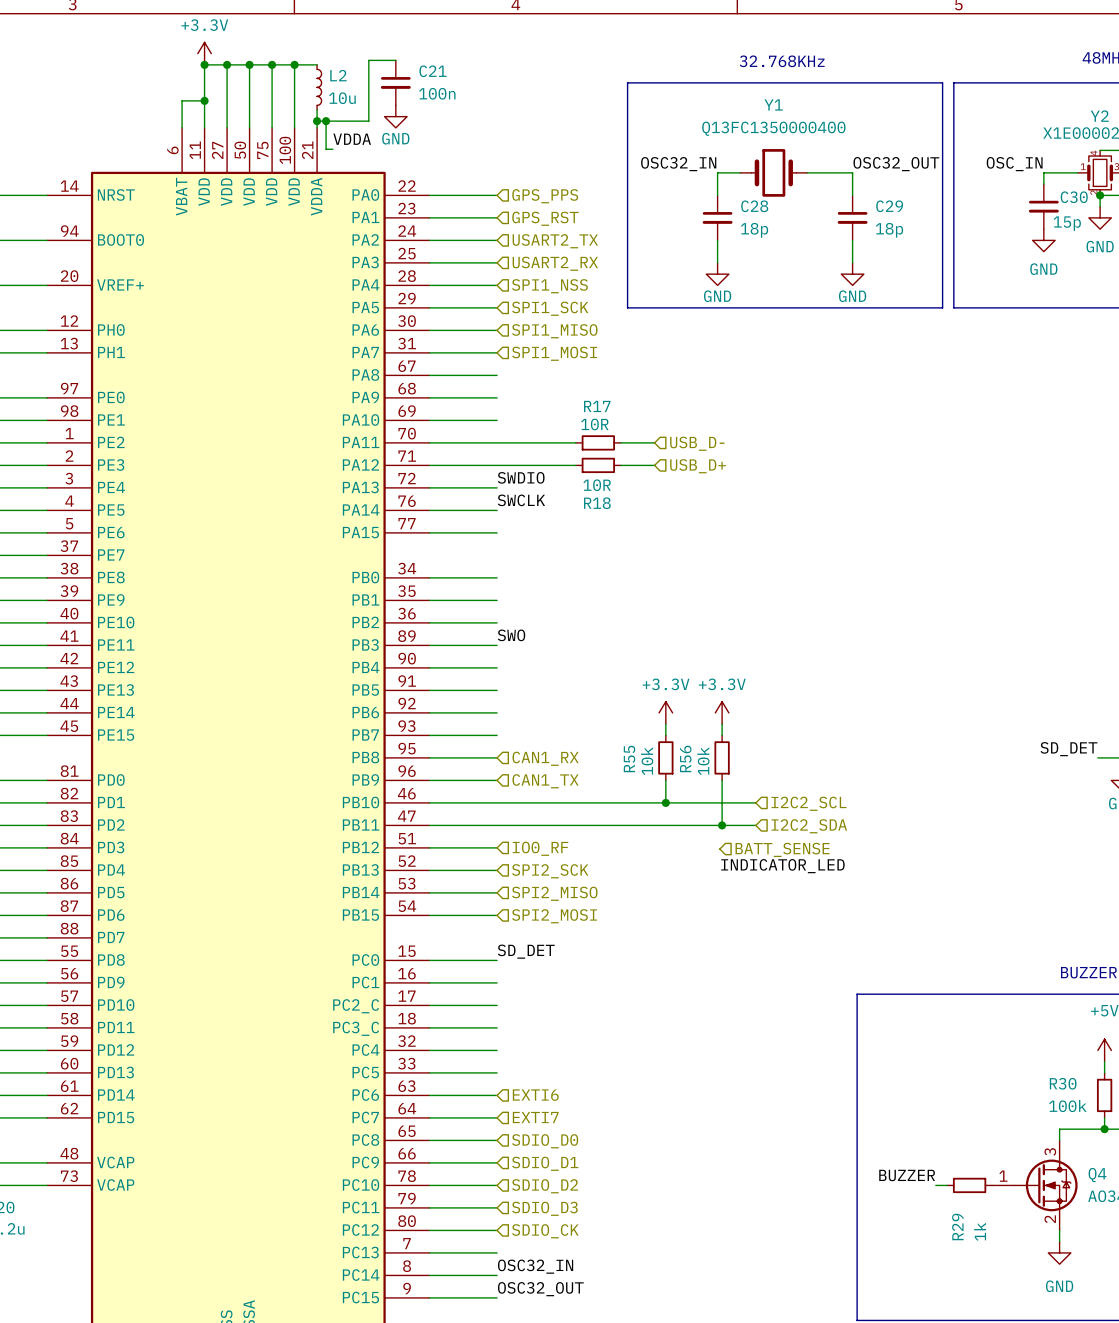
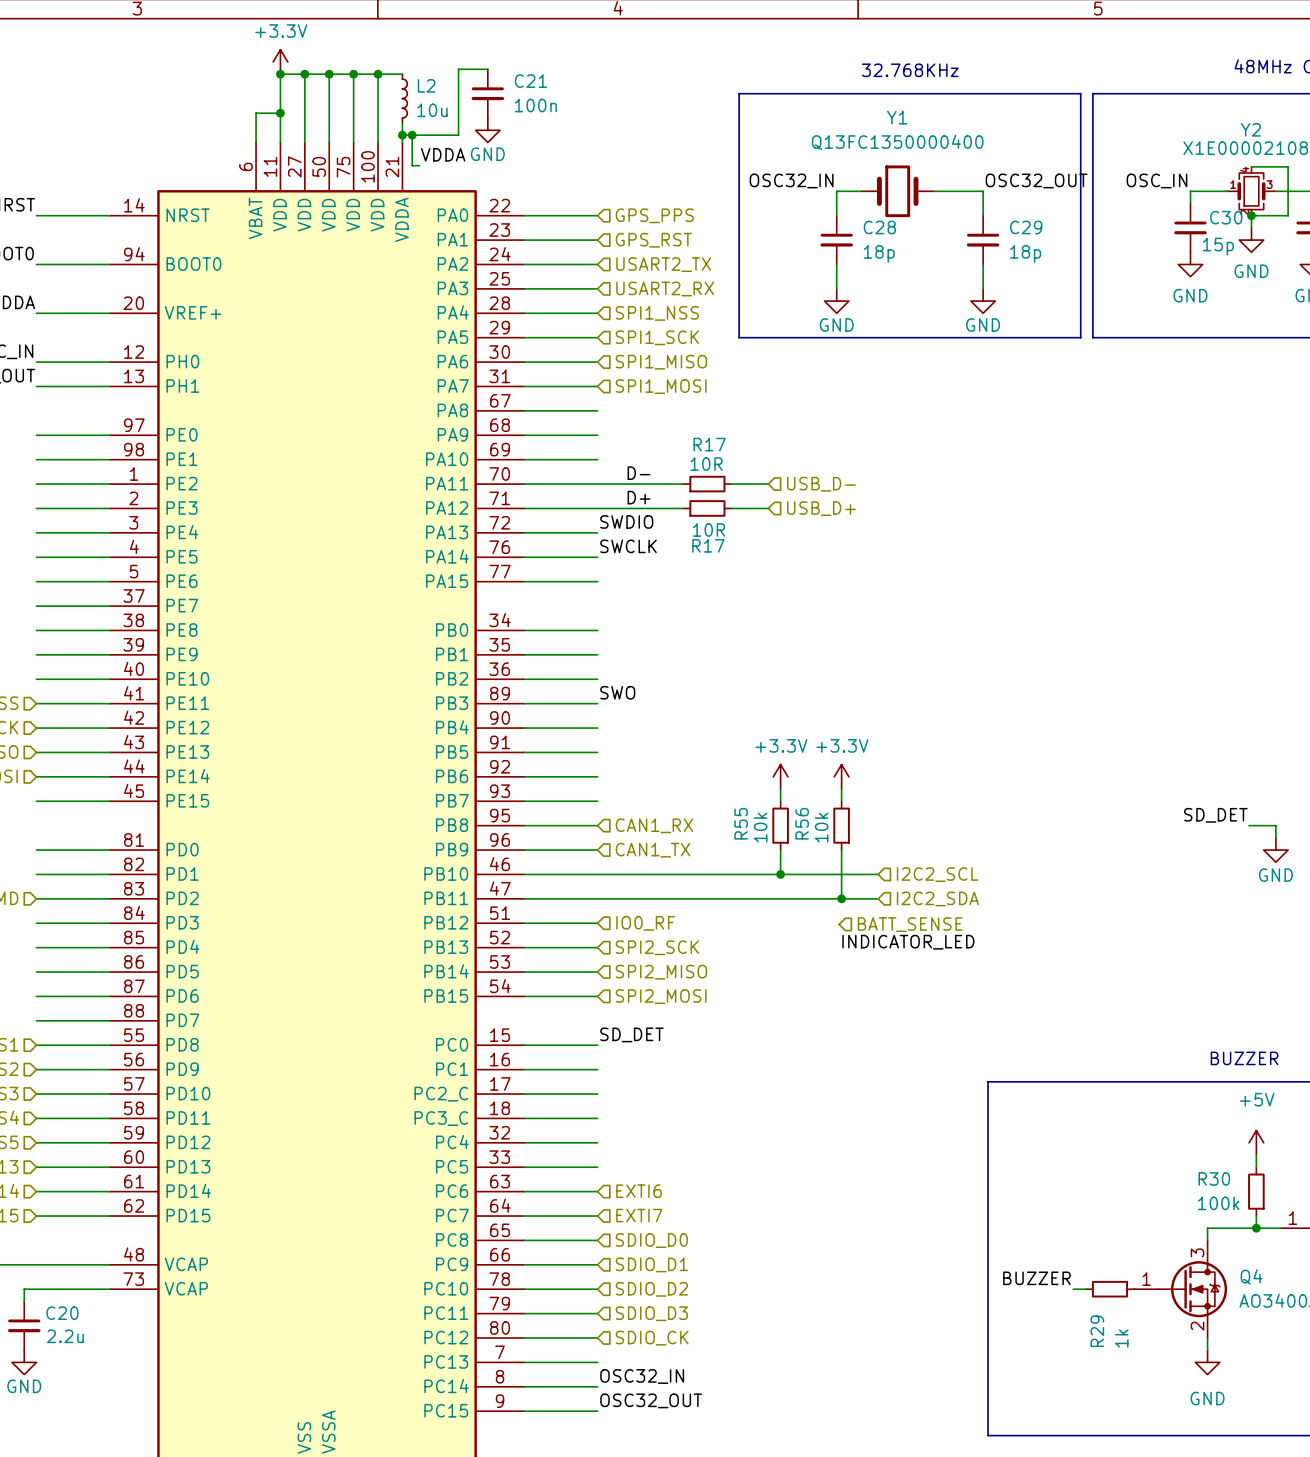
label: none -> D- (639, 473)
label: none -> D+ (639, 497)
R18 name: R18 (597, 503) -> R17 (708, 545)

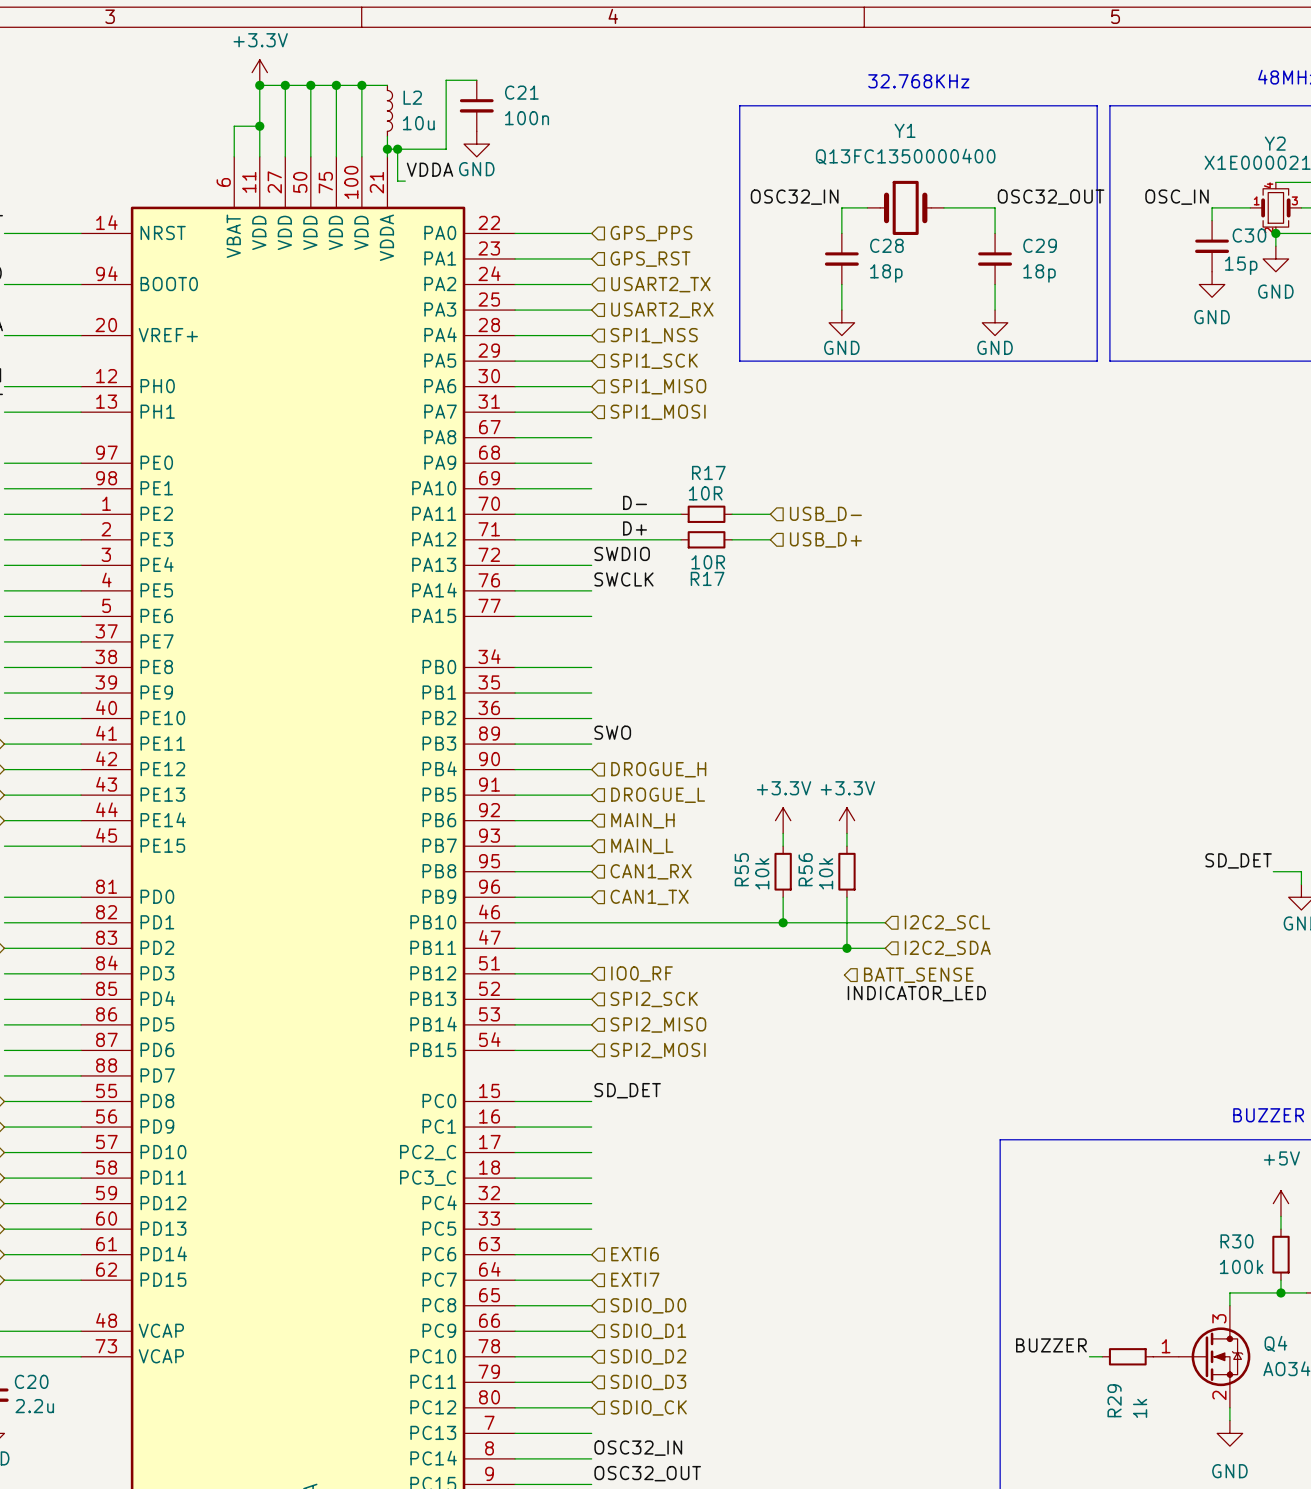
hierarchical label: none -> DROGUE_H (658, 769)
hierarchical label: none -> DROGUE_L (658, 795)
hierarchical label: none -> MAIN_H (642, 820)
hierarchical label: none -> MAIN_L (642, 846)

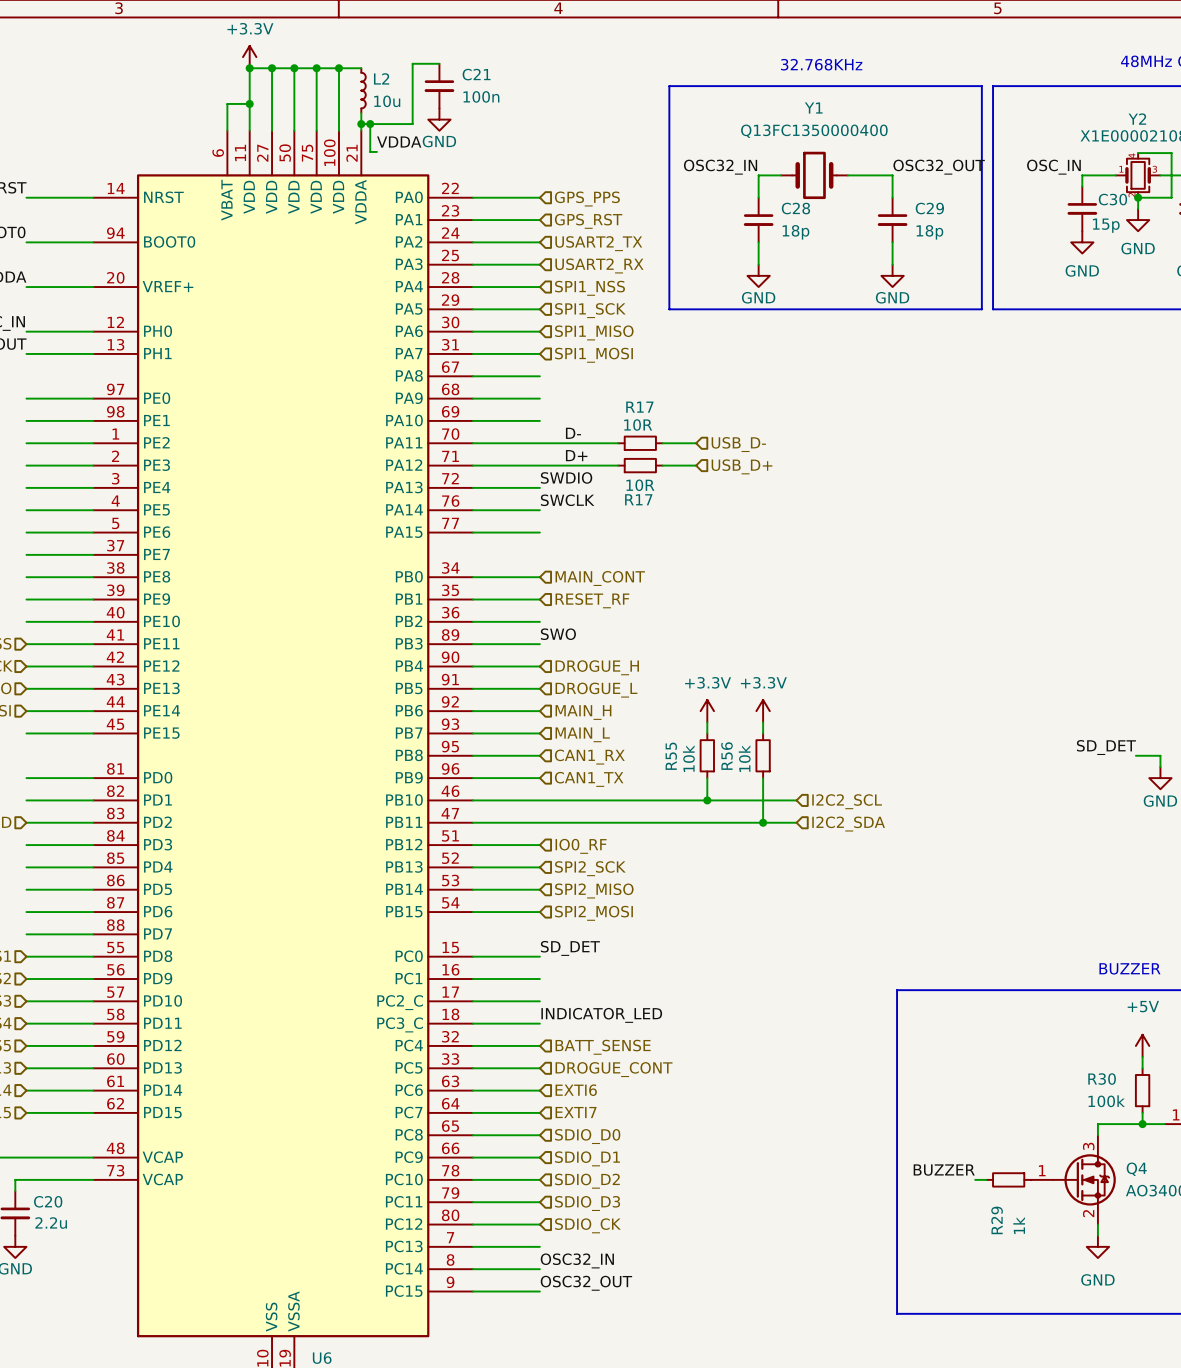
hierarchical label: none -> MAIN_CONT (600, 578)
hierarchical label: none -> RESET_RF (592, 600)
hierarchical label: BATT_SENSE (918, 975) -> none
label: INDICATOR_LED (916, 993) -> none
label: none -> INDICATOR_LED (601, 1015)
hierarchical label: none -> BATT_SENSE (603, 1047)
hierarchical label: none -> DROGUE_CONT (614, 1069)

